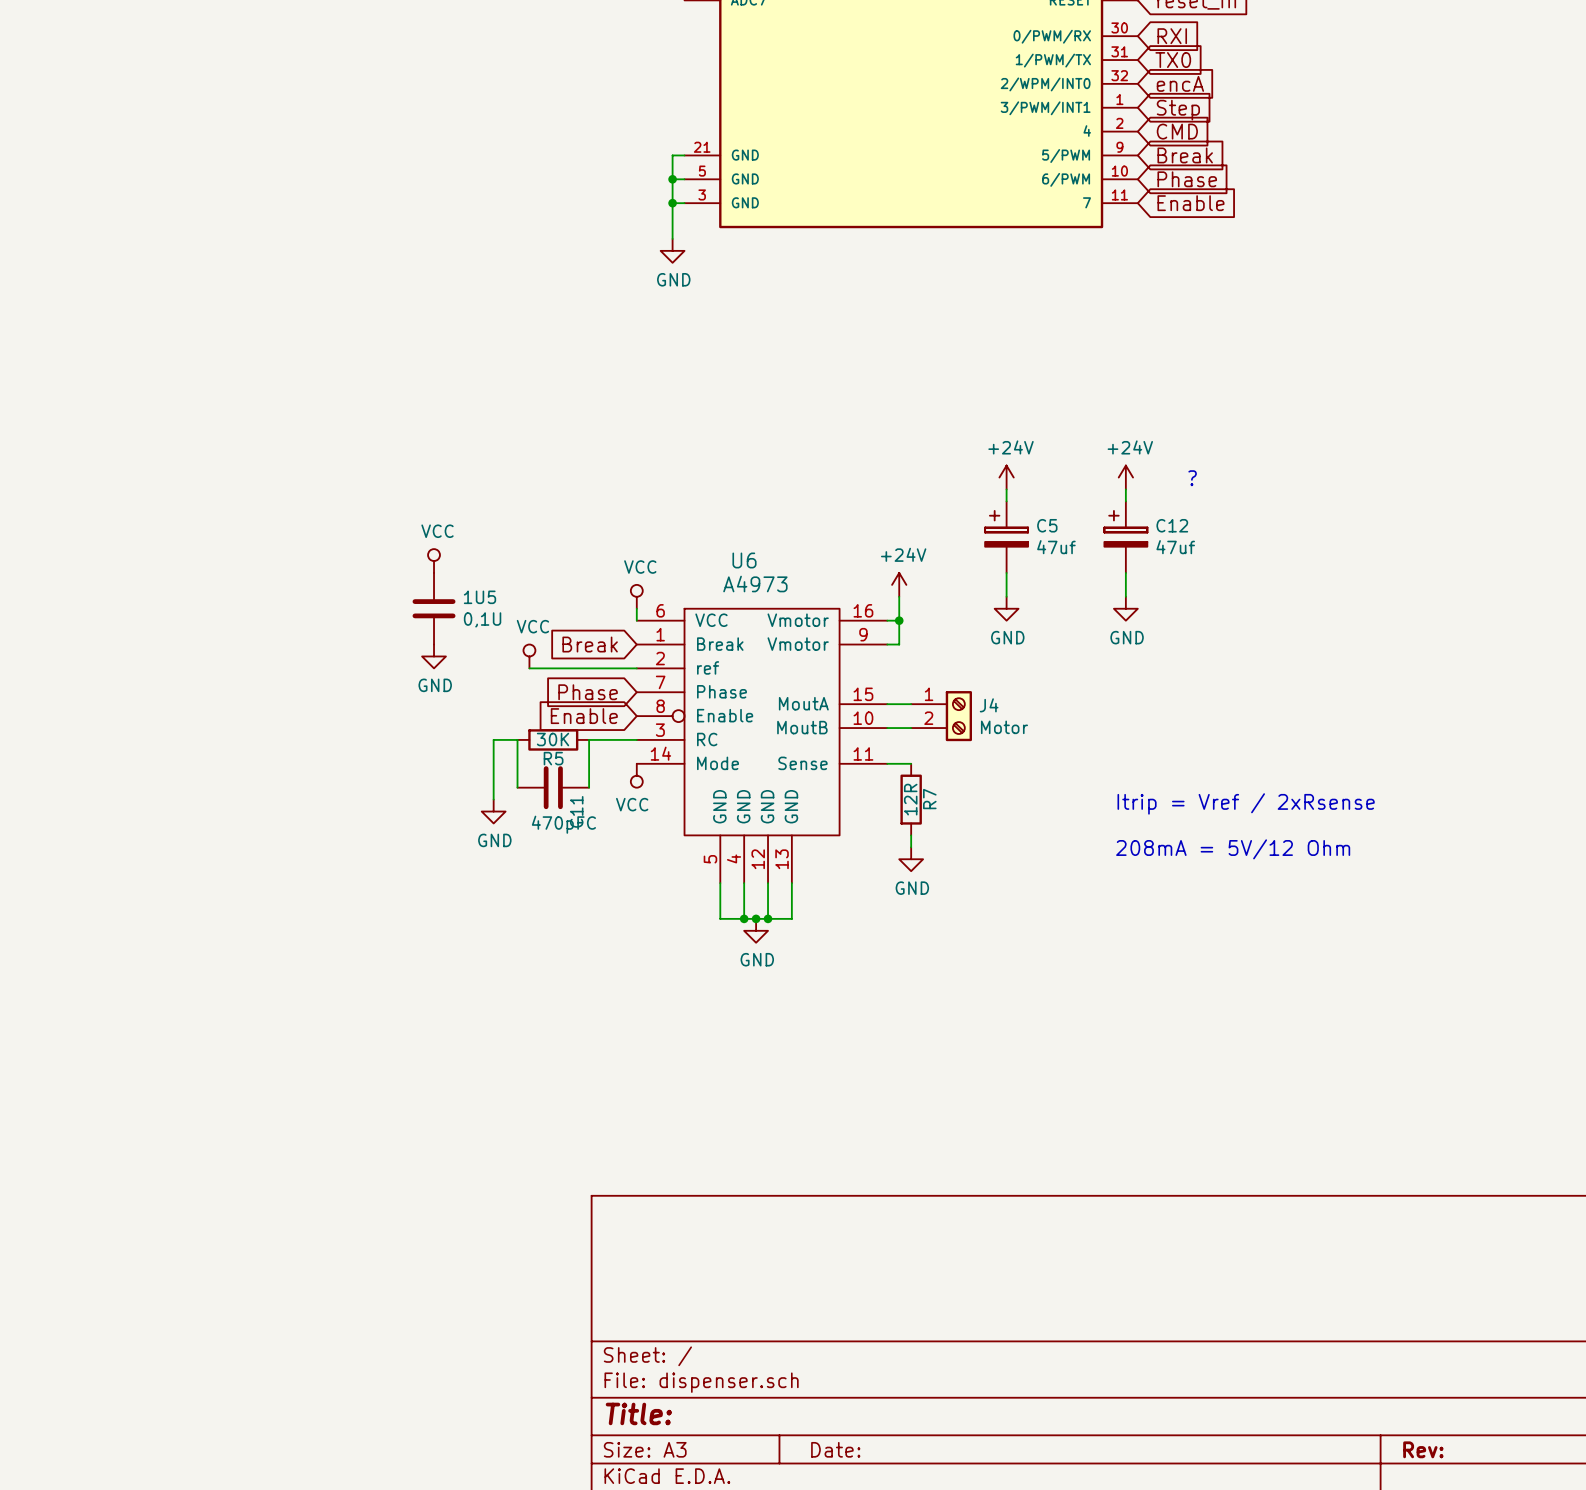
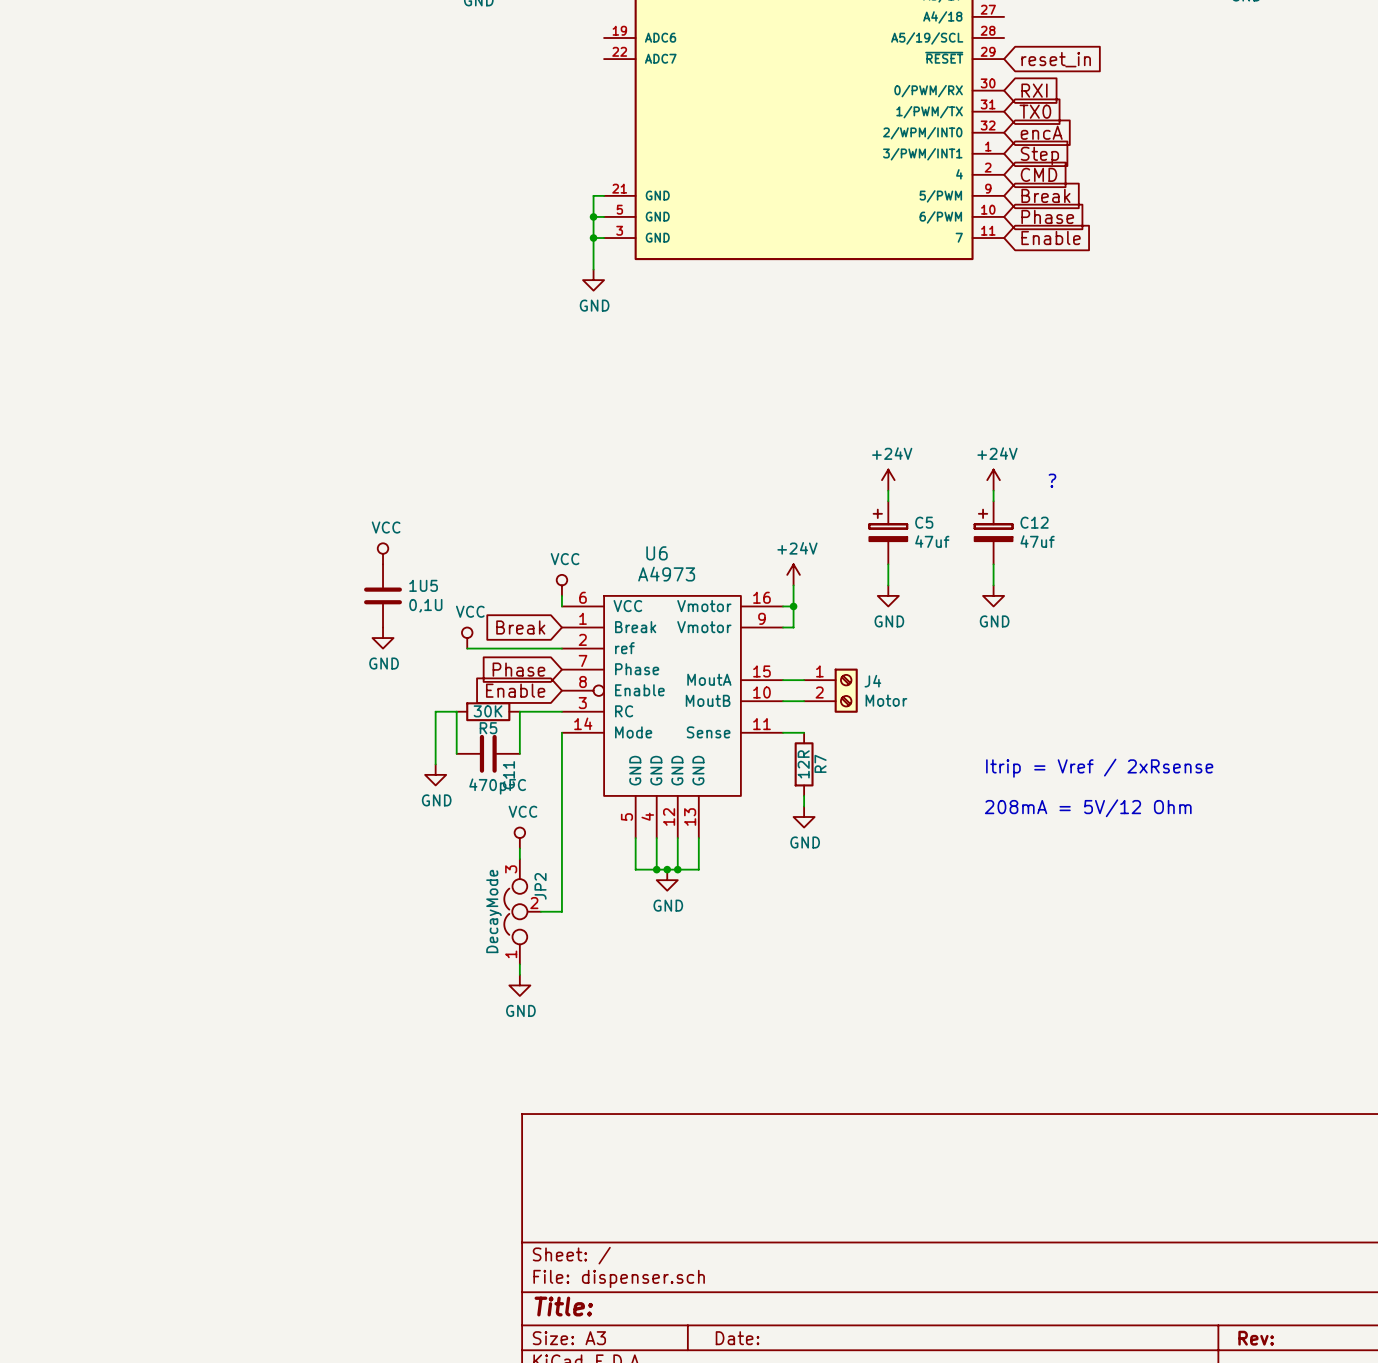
wire: none -> (561, 732) (561, 911) (540, 911)
power symbol rotation: 0° (636, 775) -> 180° (519, 838)
power symbol position: VCC (636, 775) -> VCC (519, 838)
wire: none -> (519, 848) (519, 859)
JP2: none -> DecayMode (522, 911)
wire: none -> (519, 964) (519, 974)
power symbol: none -> GND (519, 985)

